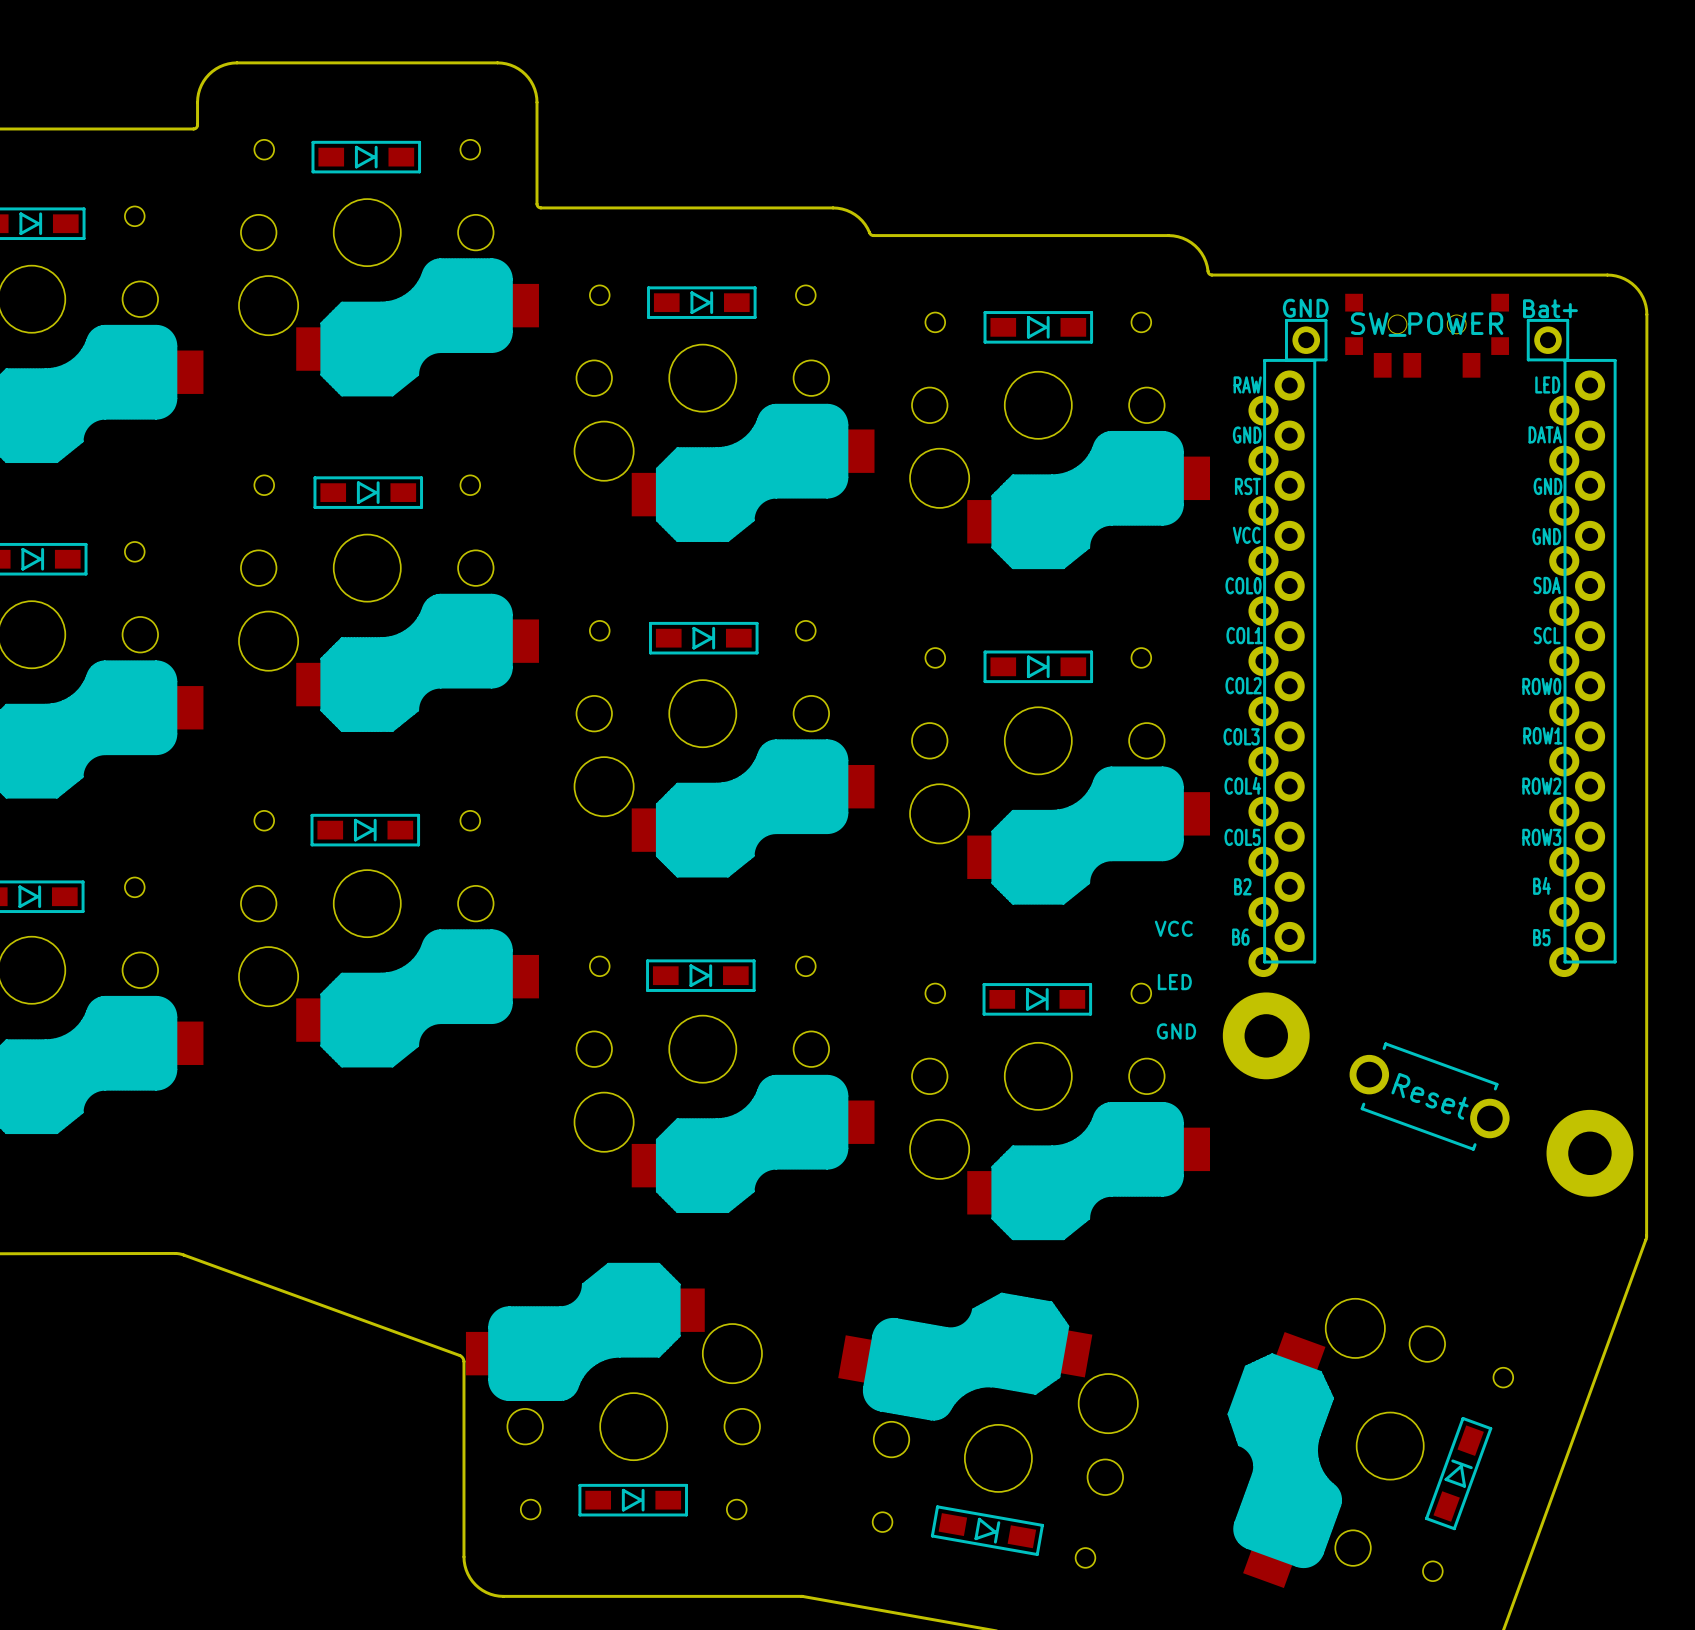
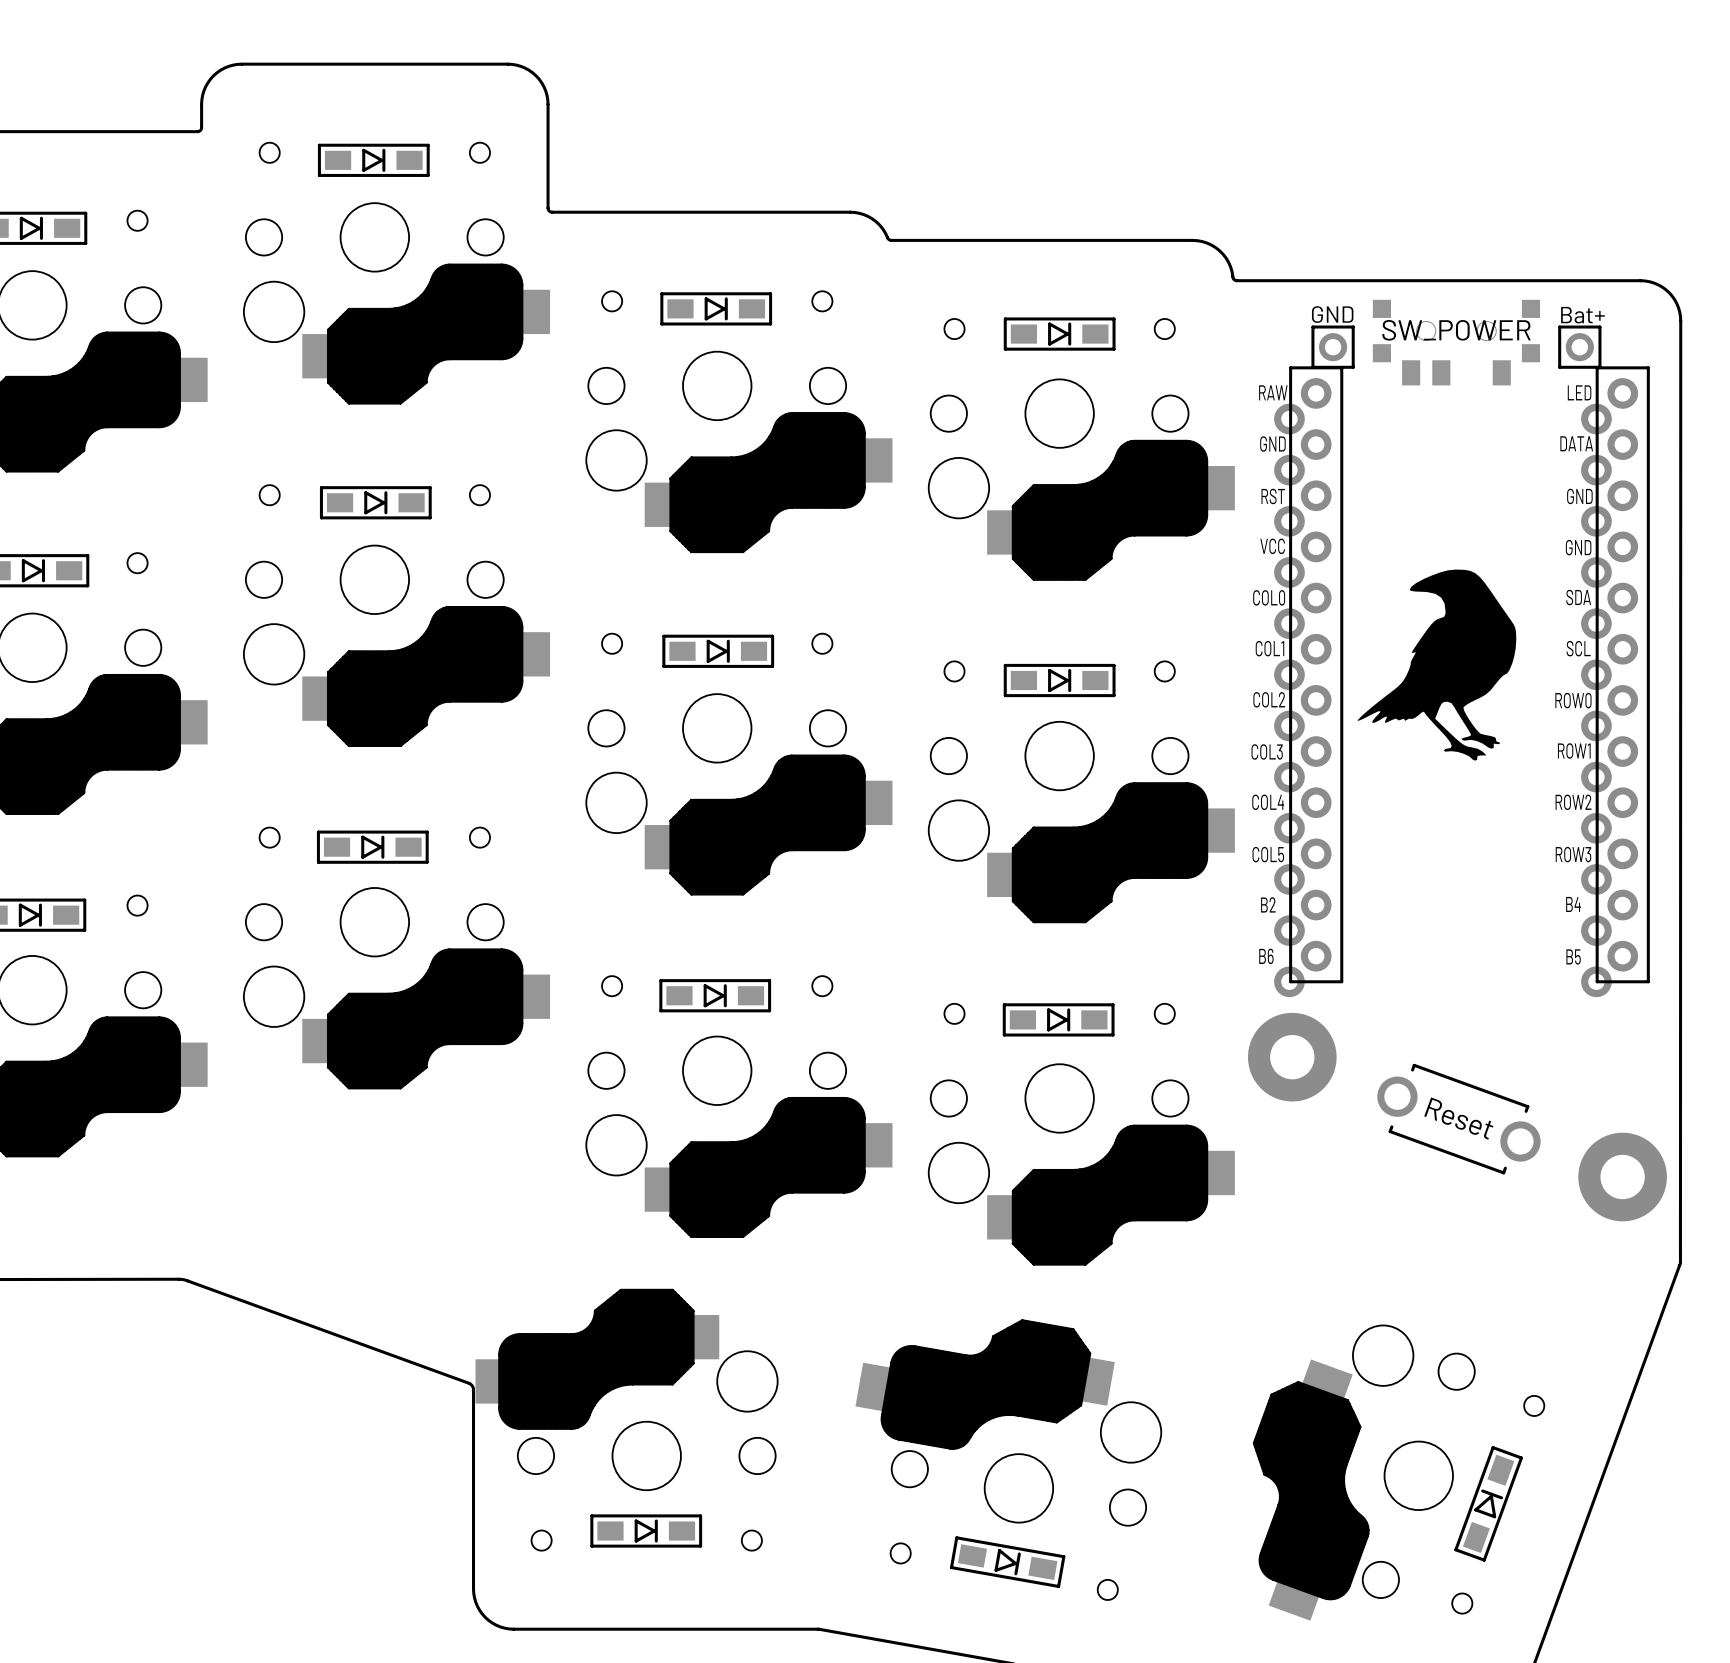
drawing: none -> [1357, 569, 1517, 761]
text: VCC (1173, 928) -> none
text: LED (1174, 982) -> none
text: GND (1176, 1031) -> none

